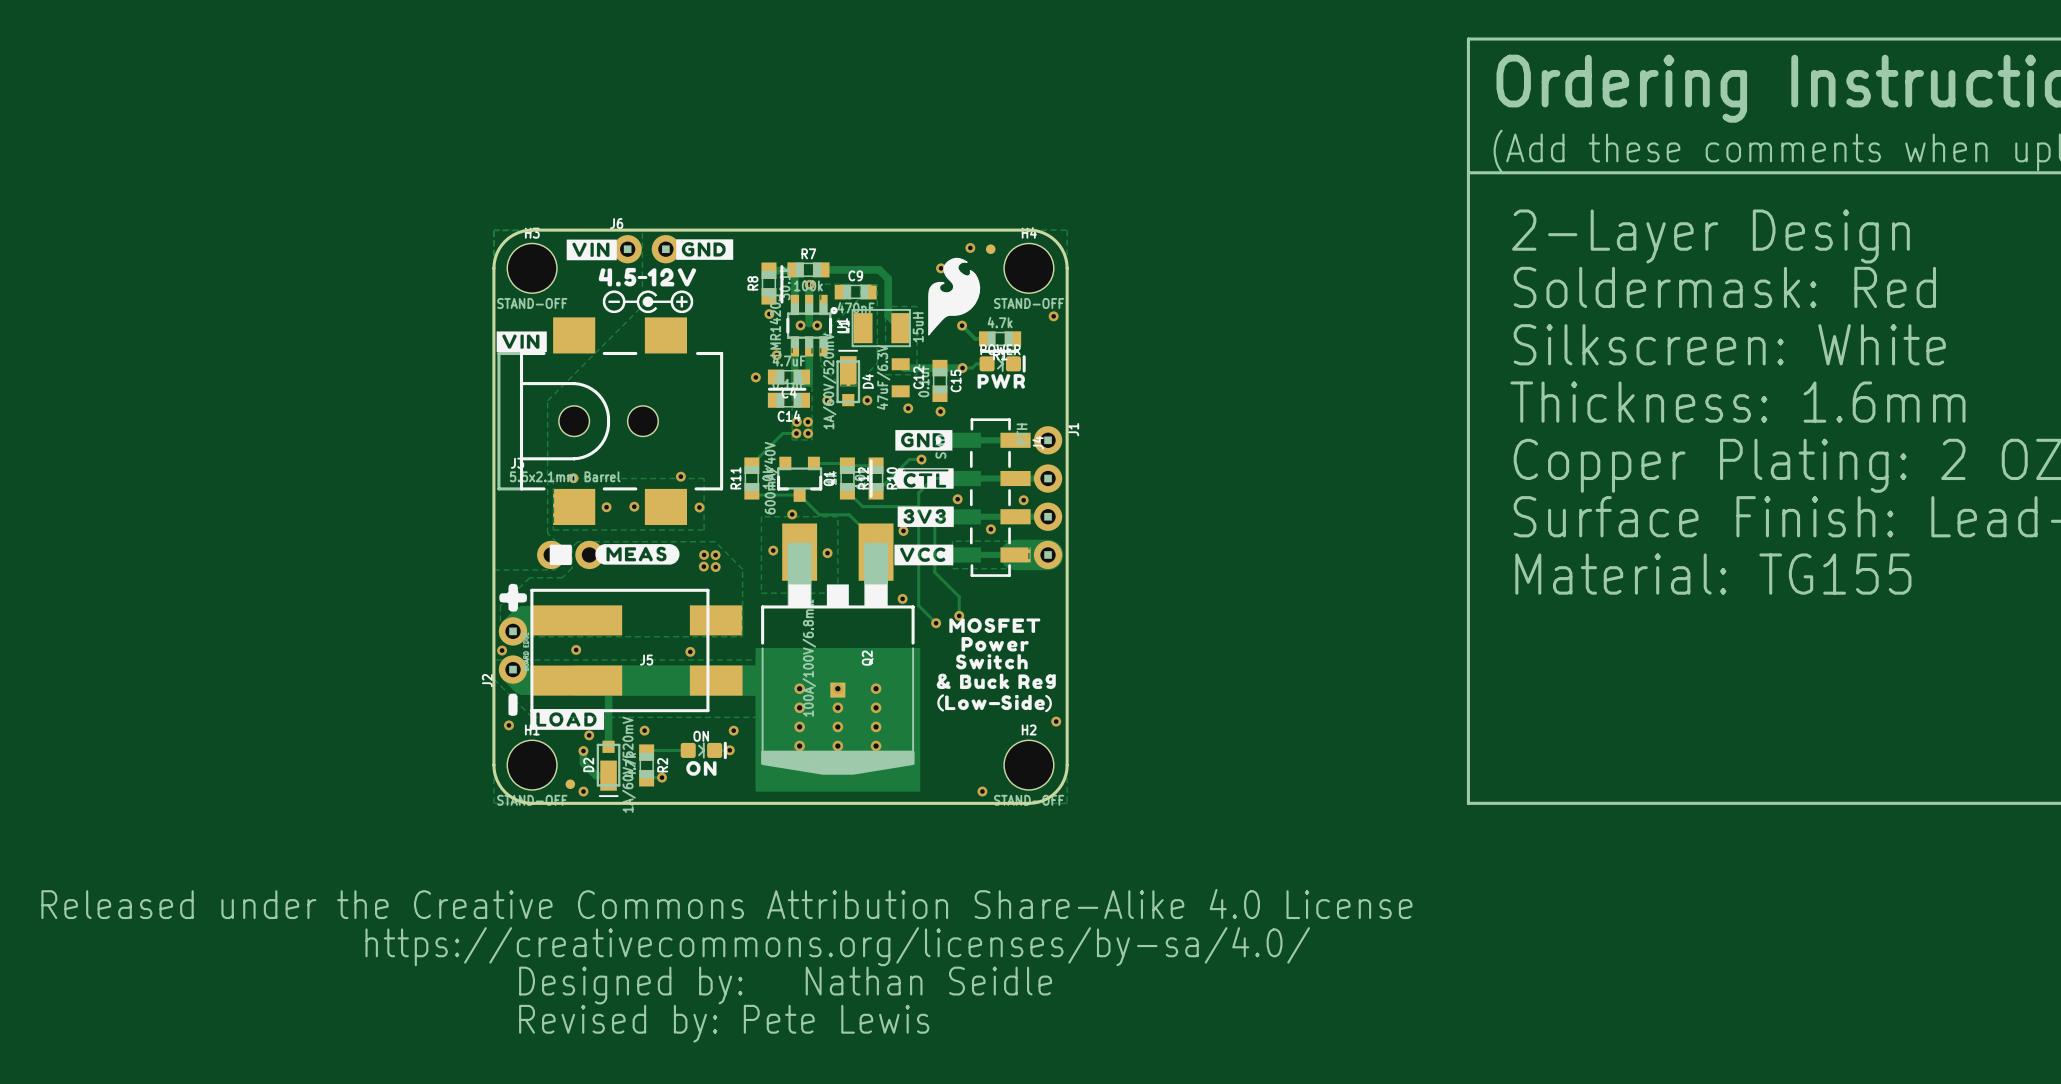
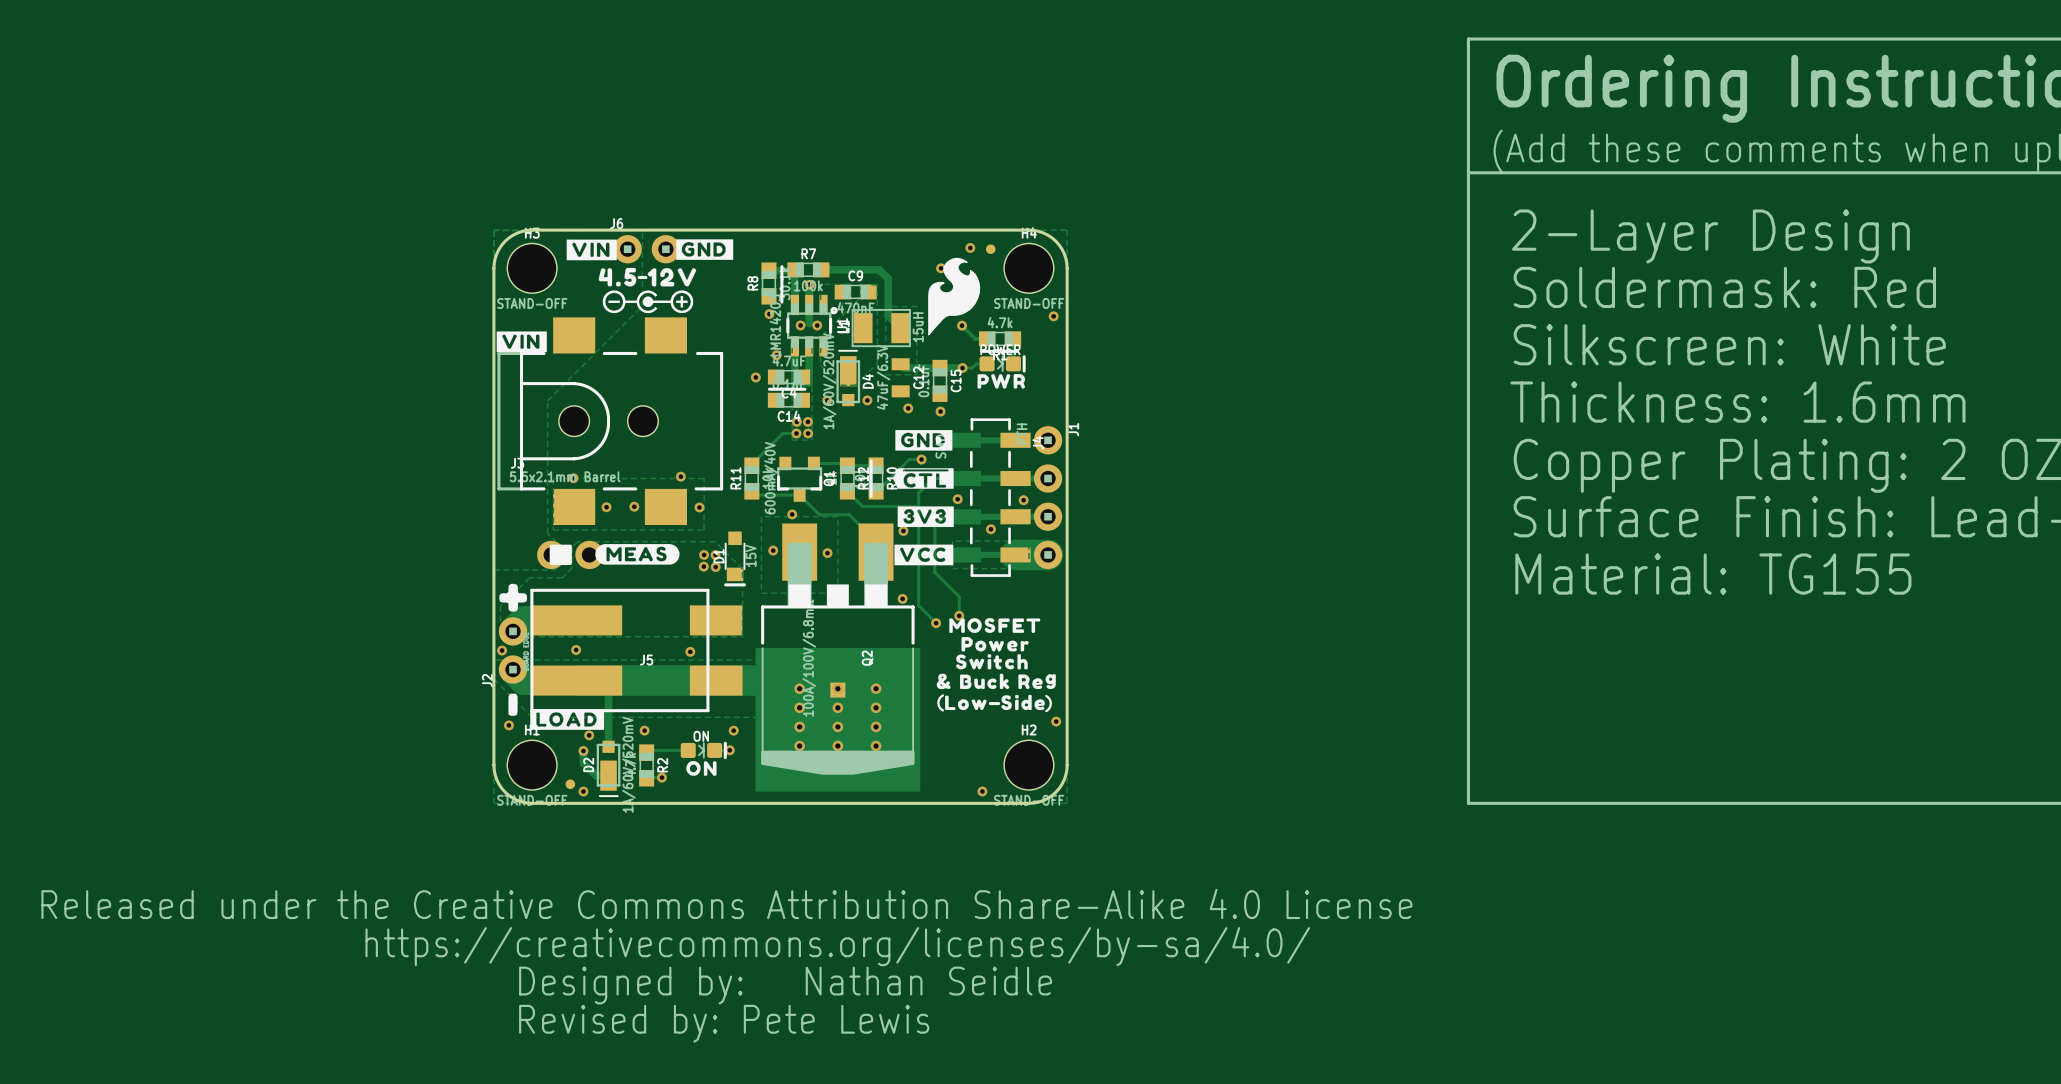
D1: none -> 15V (735, 558)

